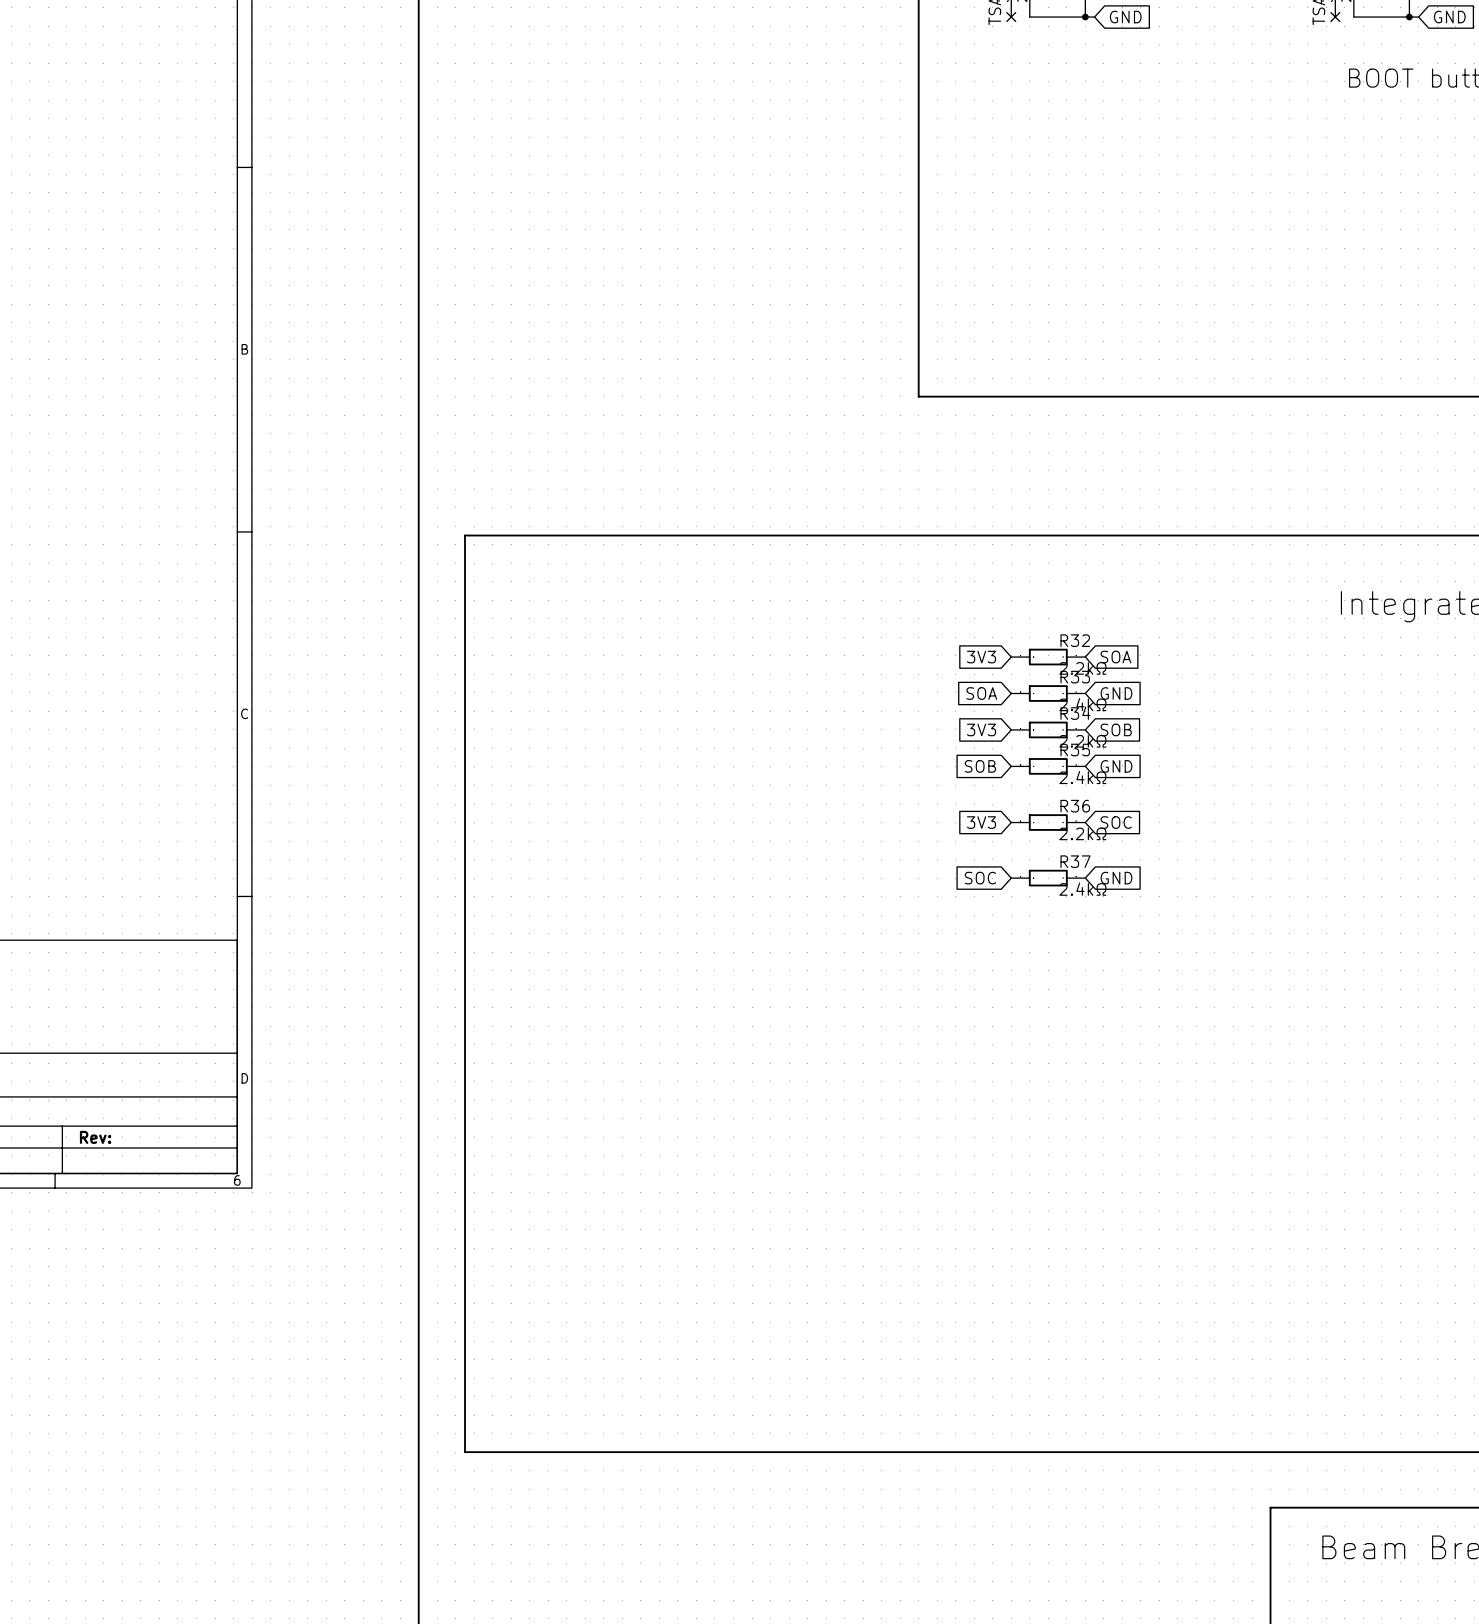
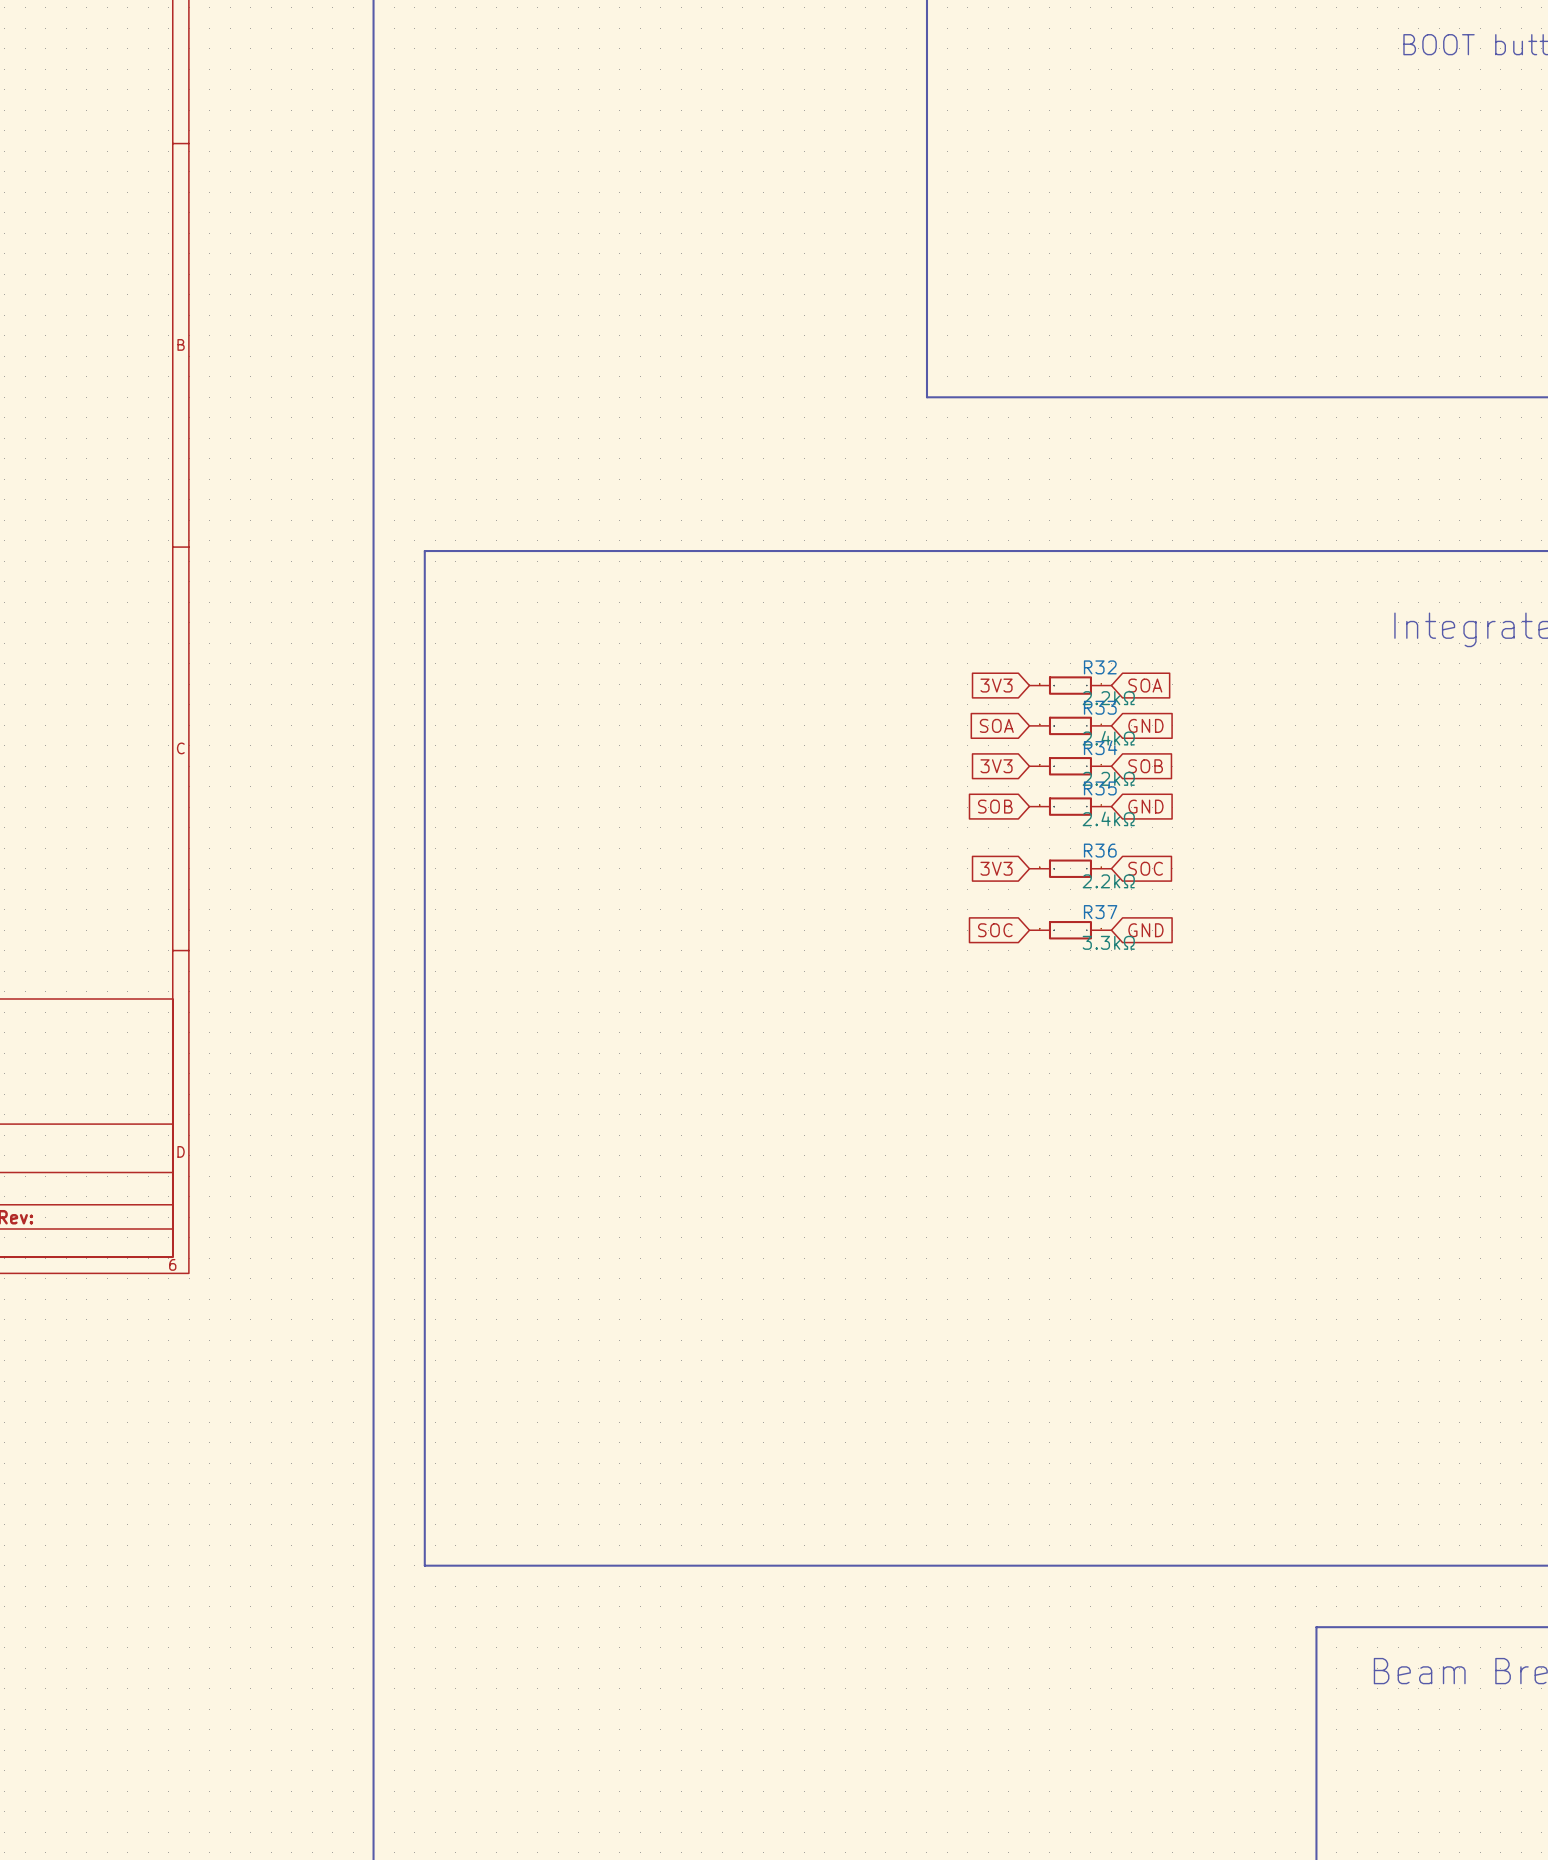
R37 value: 2.4kΩ (1082, 889) -> 3.3kΩ (1108, 942)

